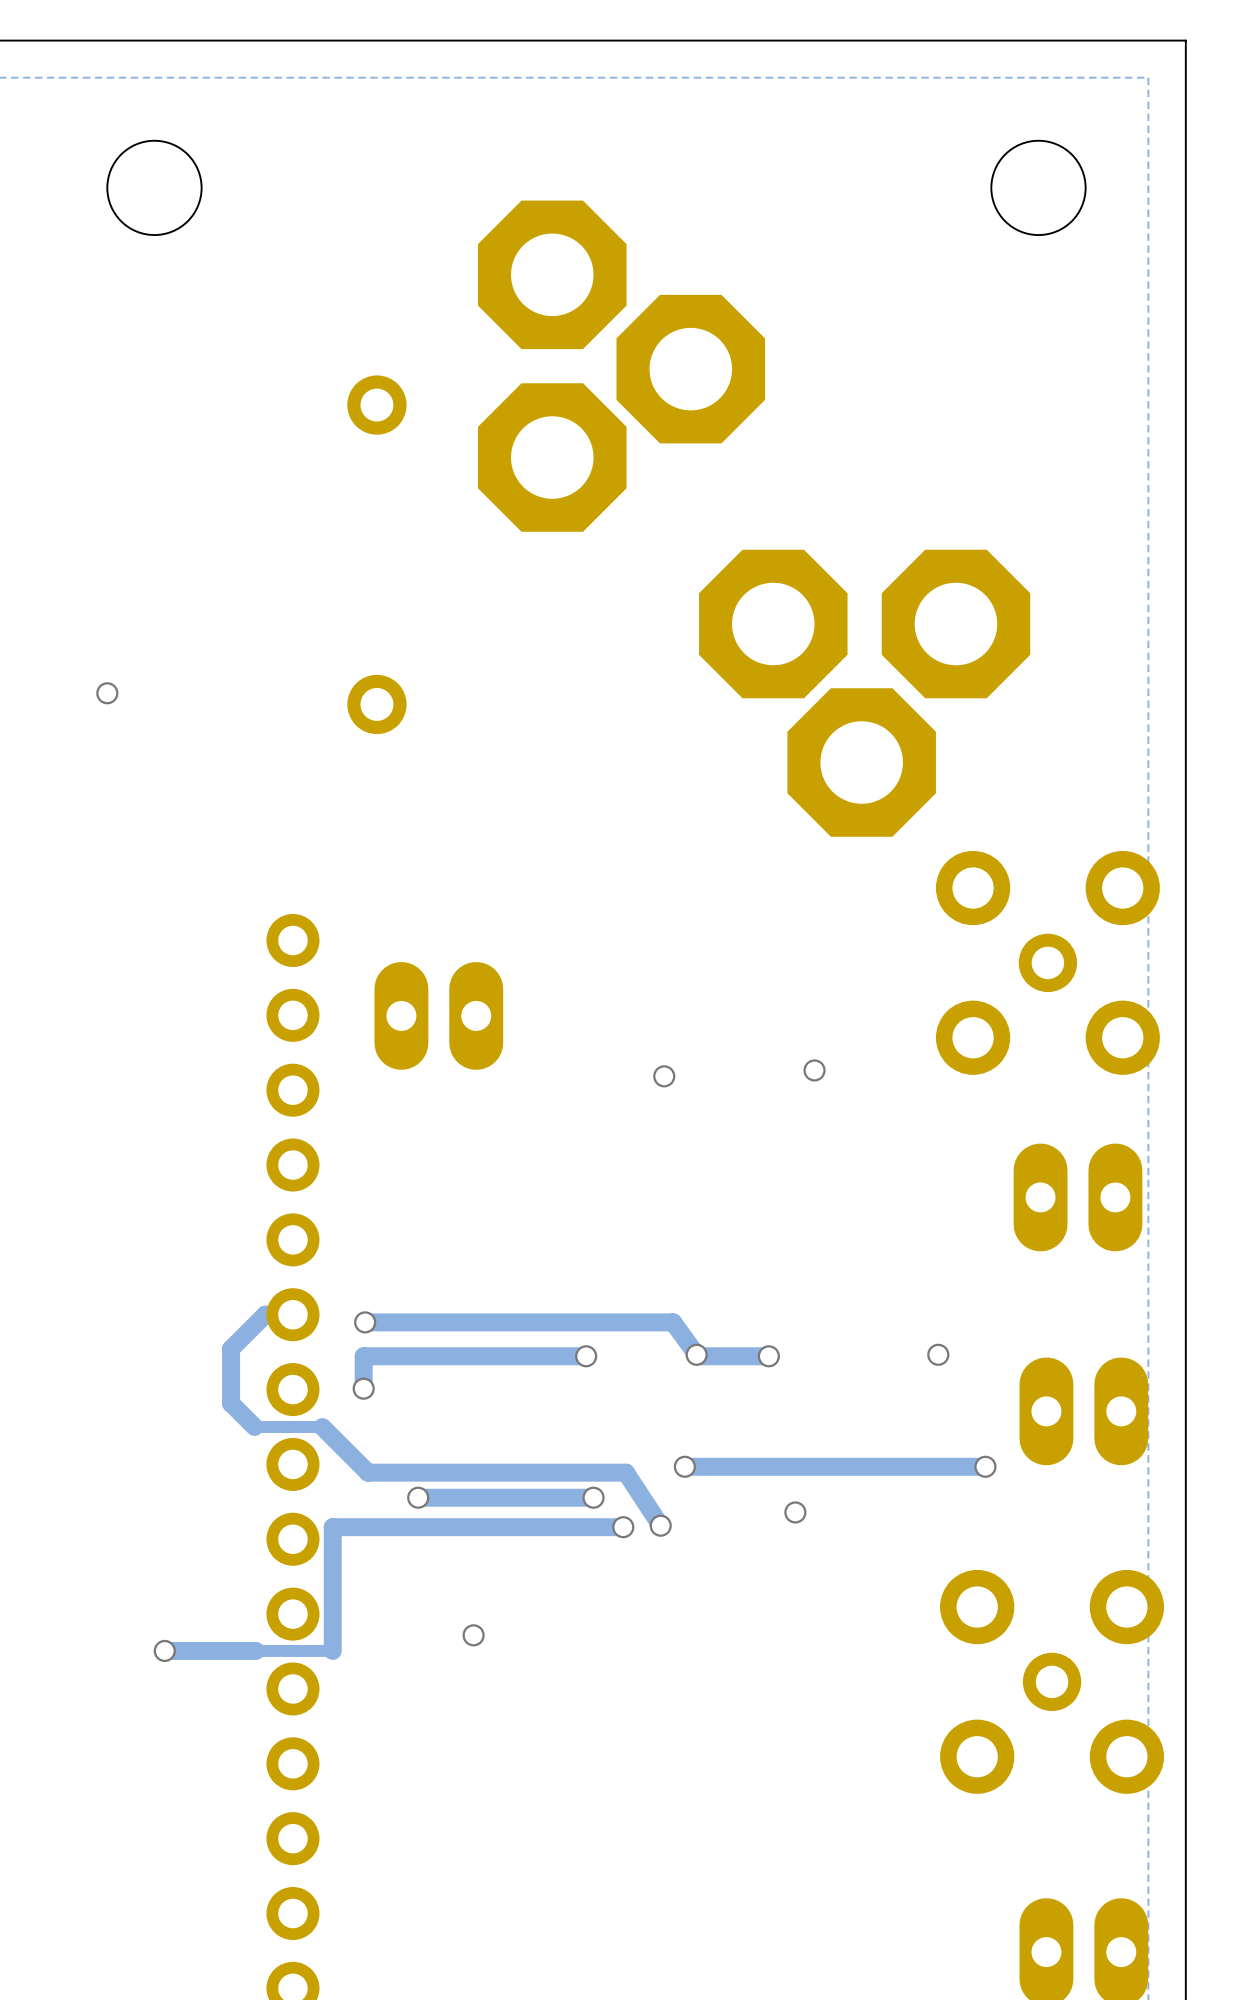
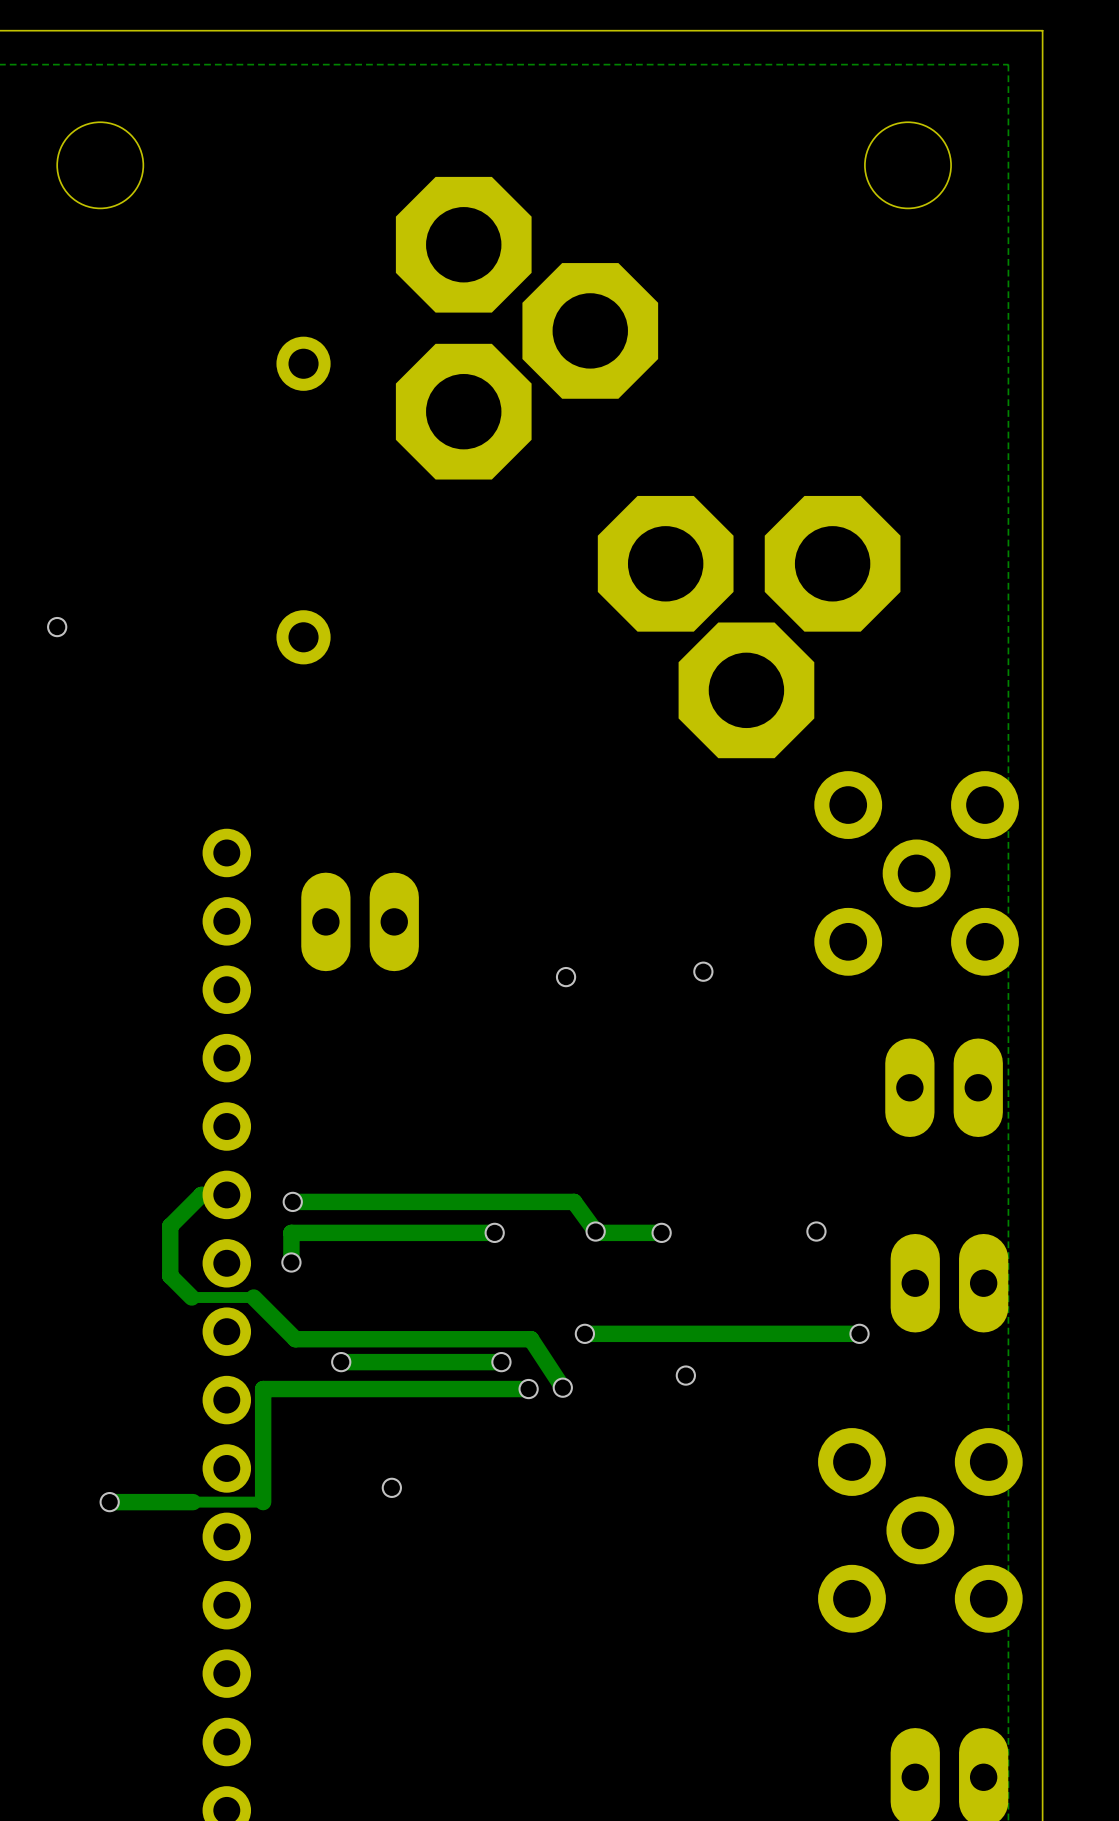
part footprint: [935, 850, 1160, 1075] -> [814, 771, 1019, 976]
part footprint: [940, 1569, 1165, 1794] -> [818, 1428, 1023, 1633]

